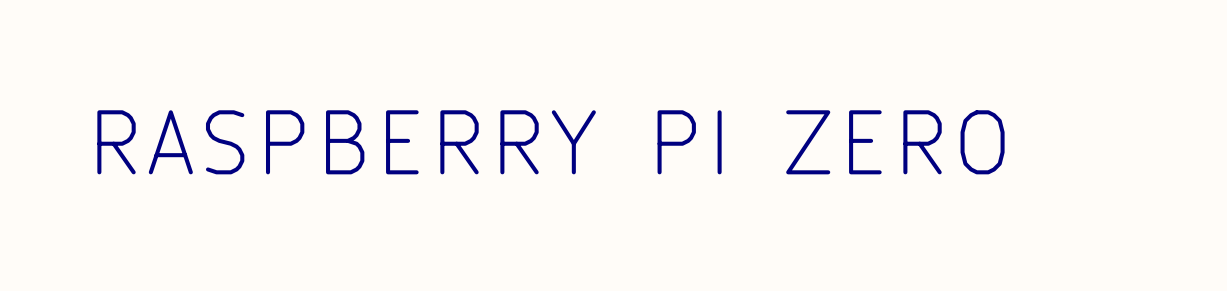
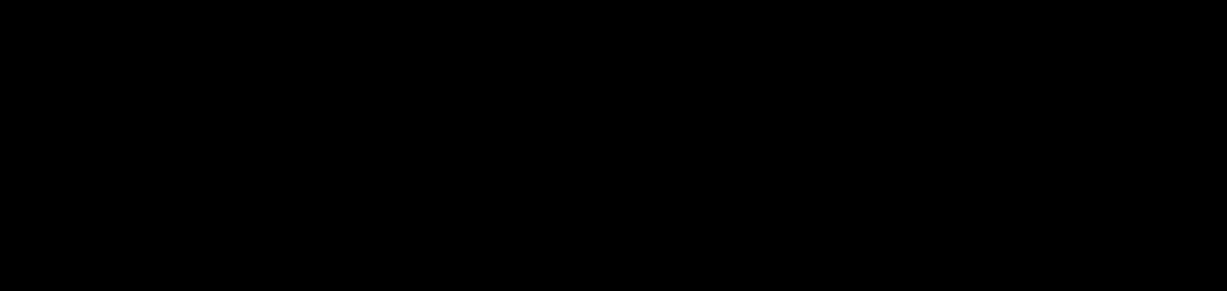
text: RASPBERRY PI ZERO (550, 142) -> none

